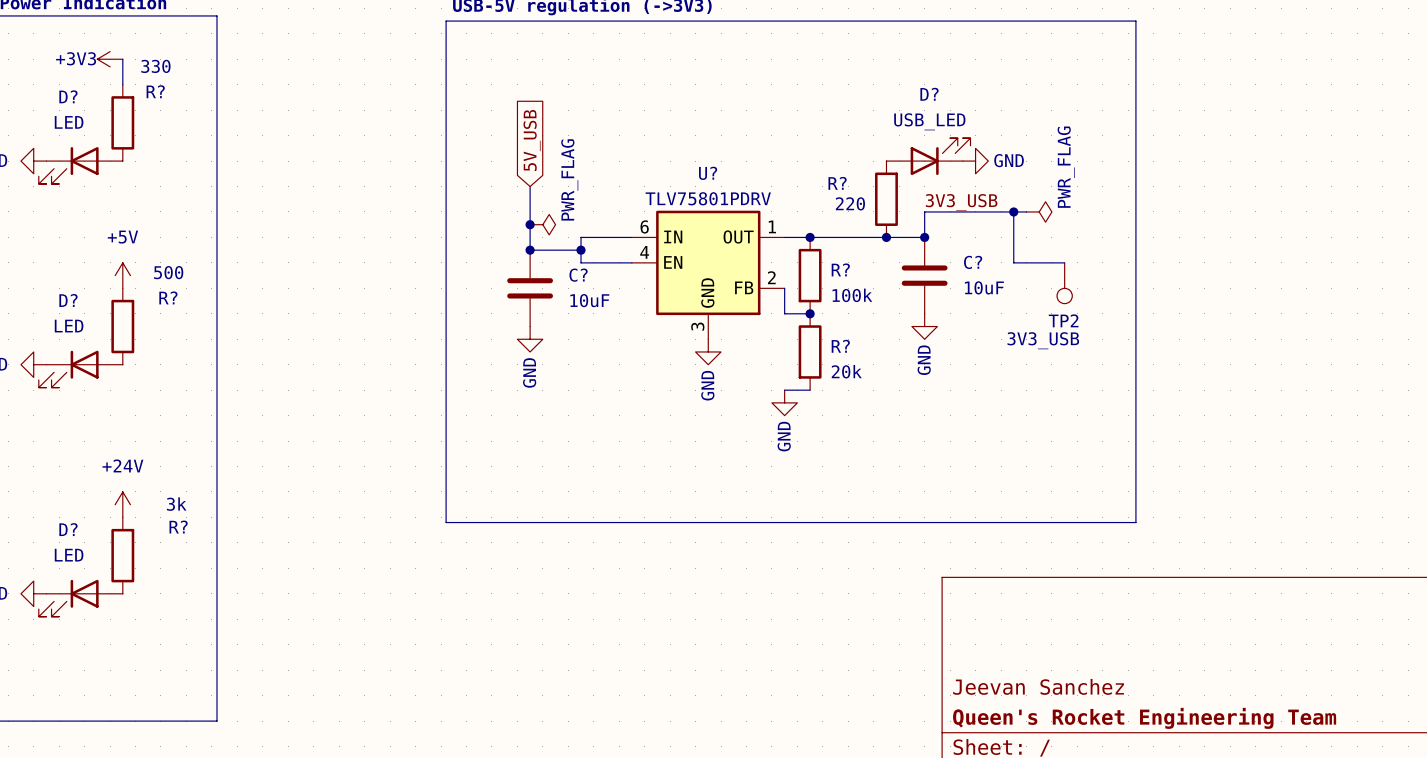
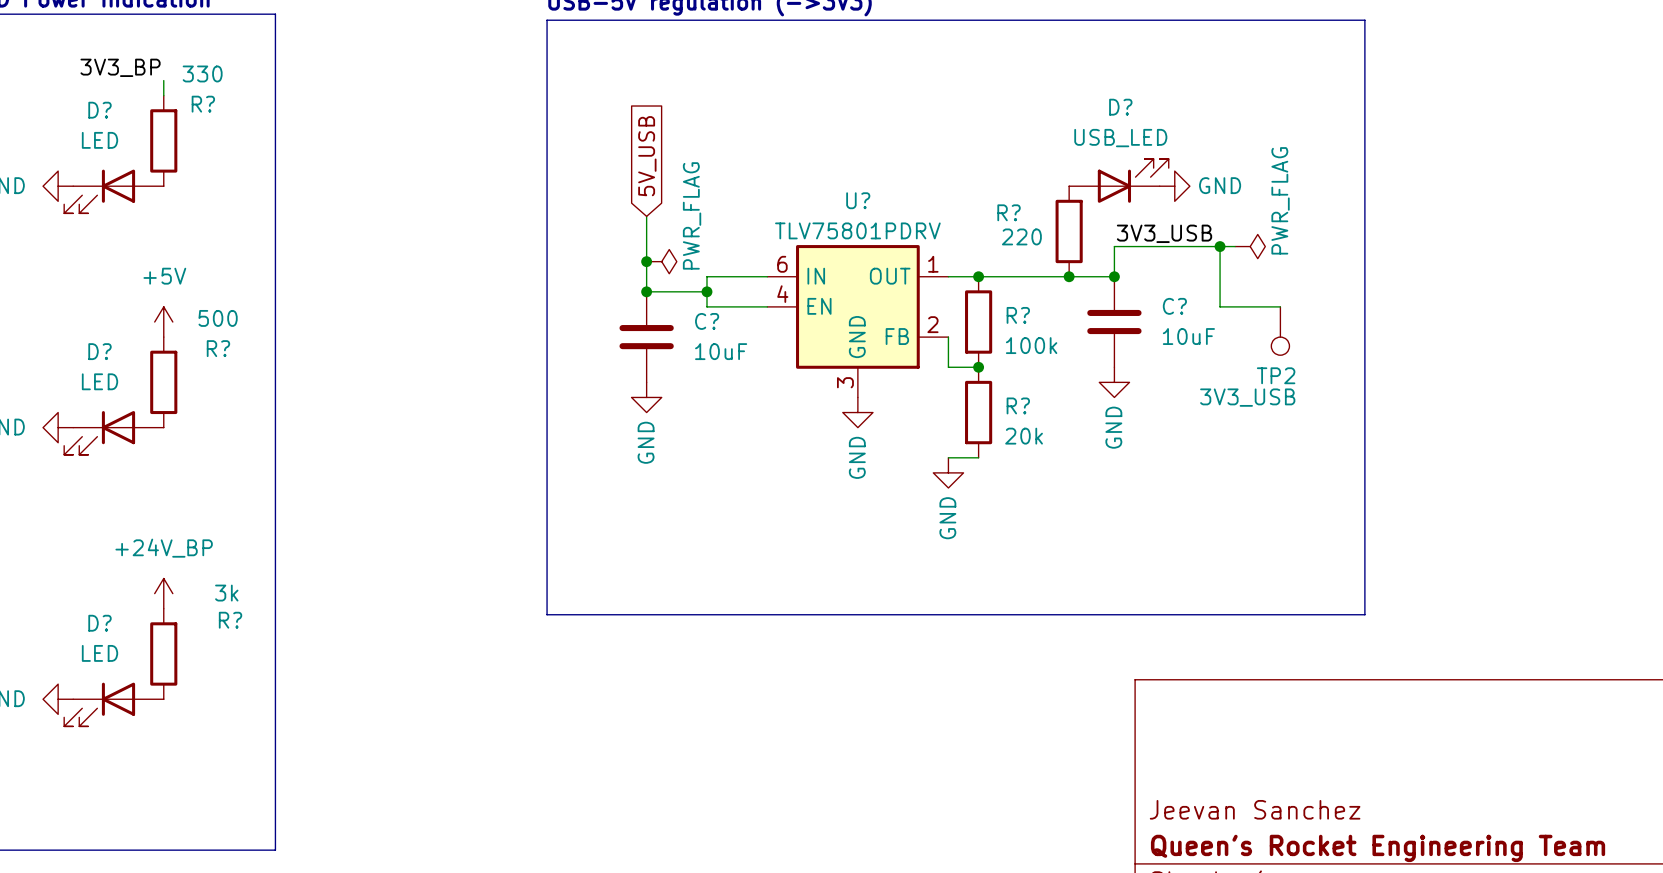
power symbol: +3V3 (110, 59) -> none
wire: (122, 59) (122, 71) -> none
label: none -> 3V3_BP (120, 67)
power symbol: +24V (122, 504) -> +24V_BP (163, 593)

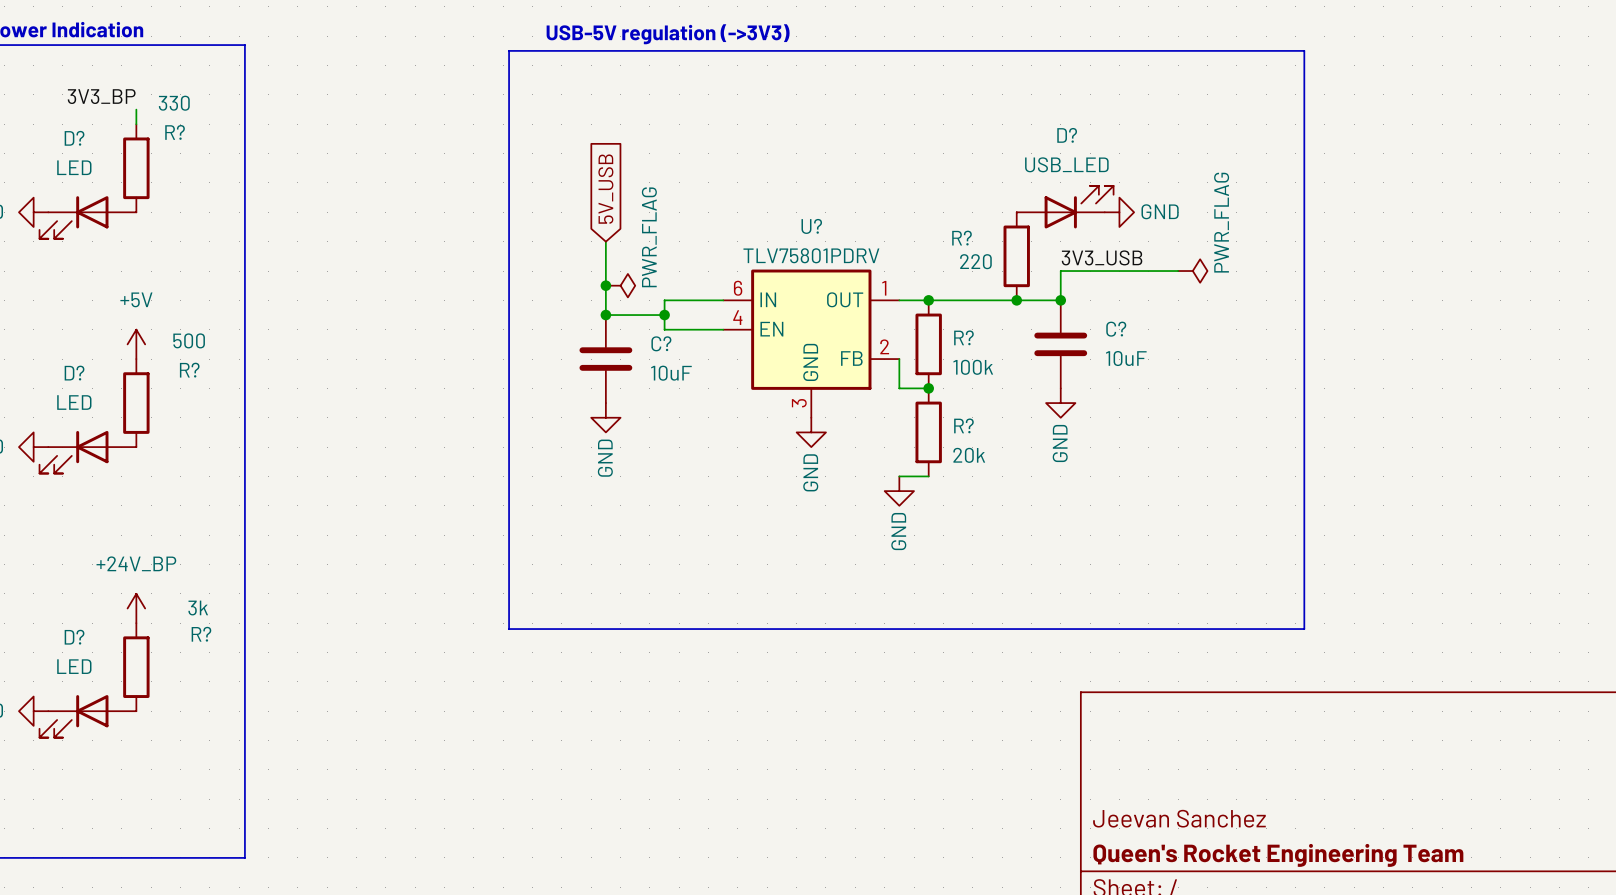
wire: (1220, 246) (1220, 306) (1280, 306) -> none
junction: (1220, 246) -> none
TP2: 3V3_USB (1280, 331) -> none

